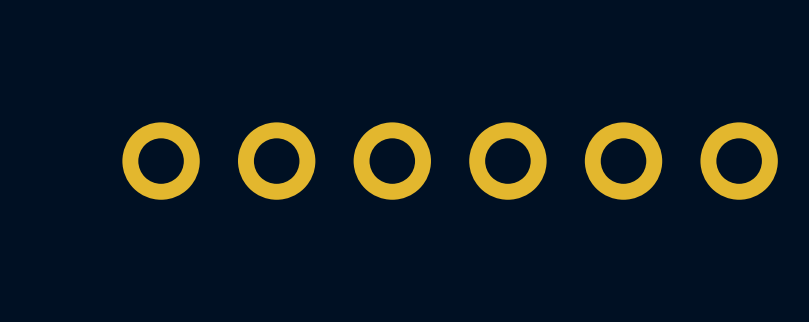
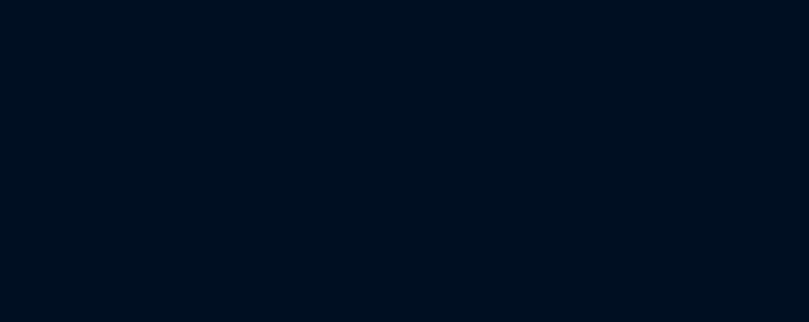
part: (450, 161) -> none

